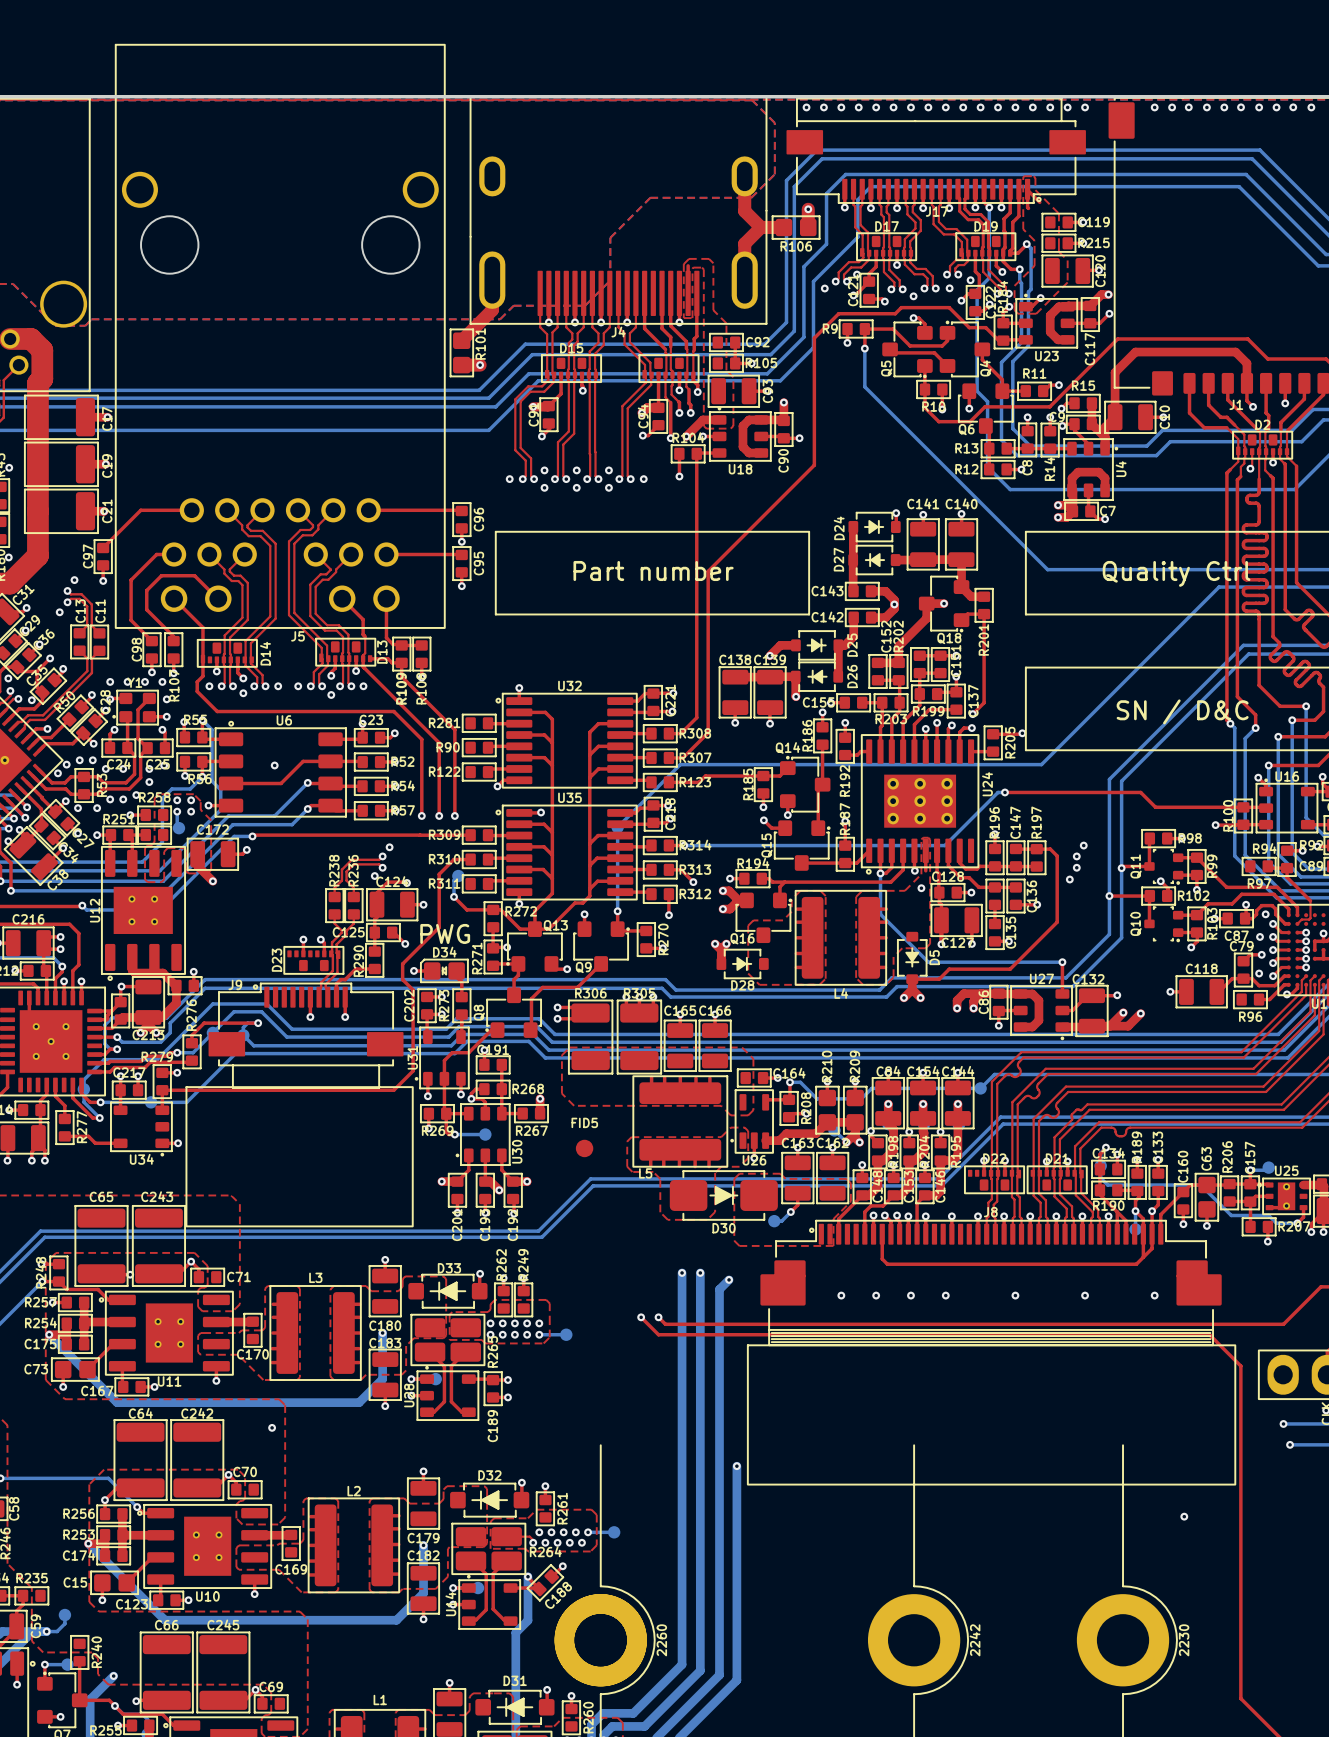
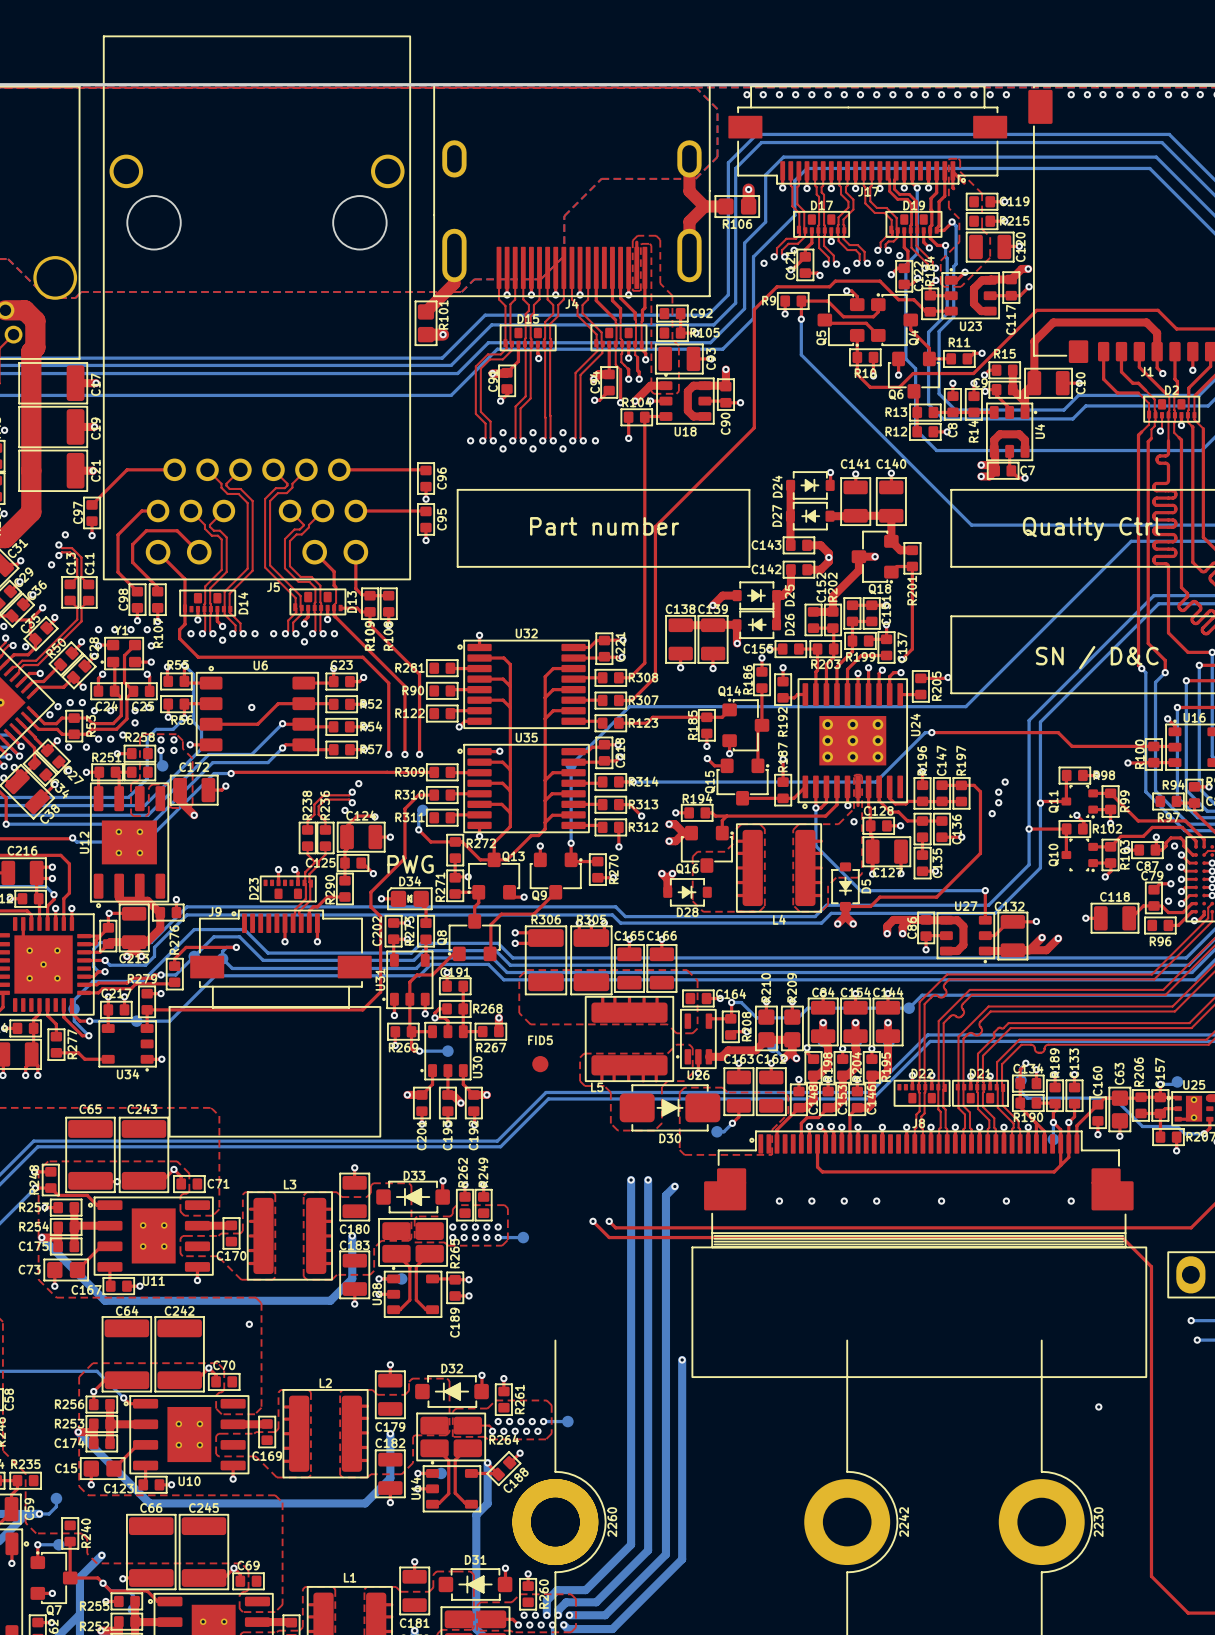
J17 footprint: [786, 97, 1086, 204] -> [728, 85, 1008, 185]

